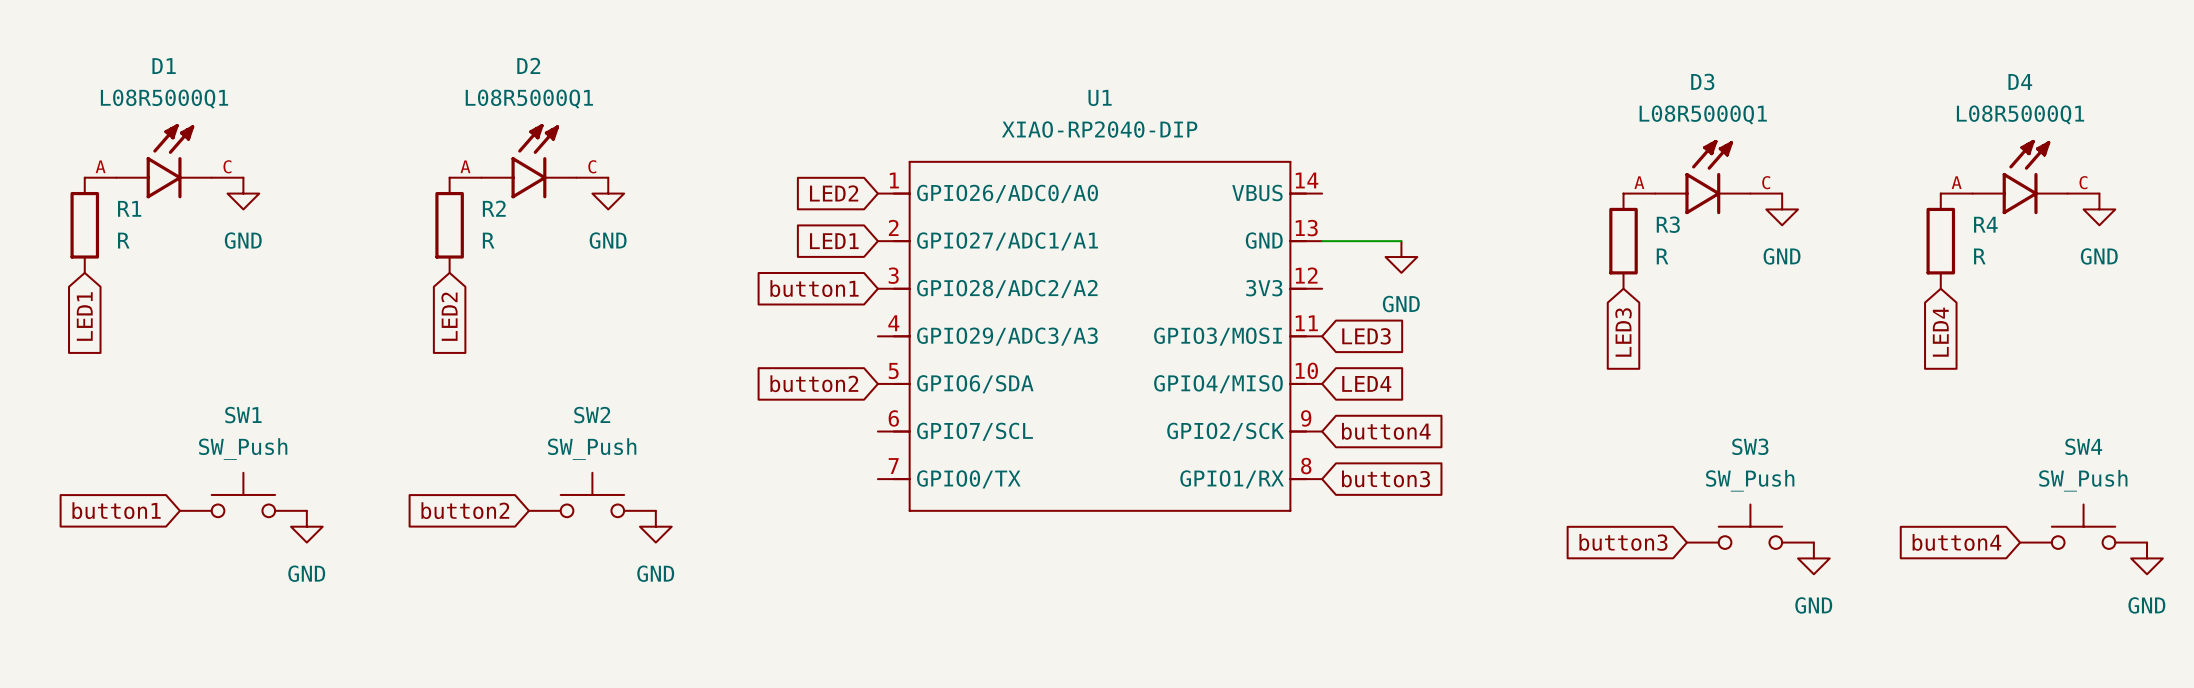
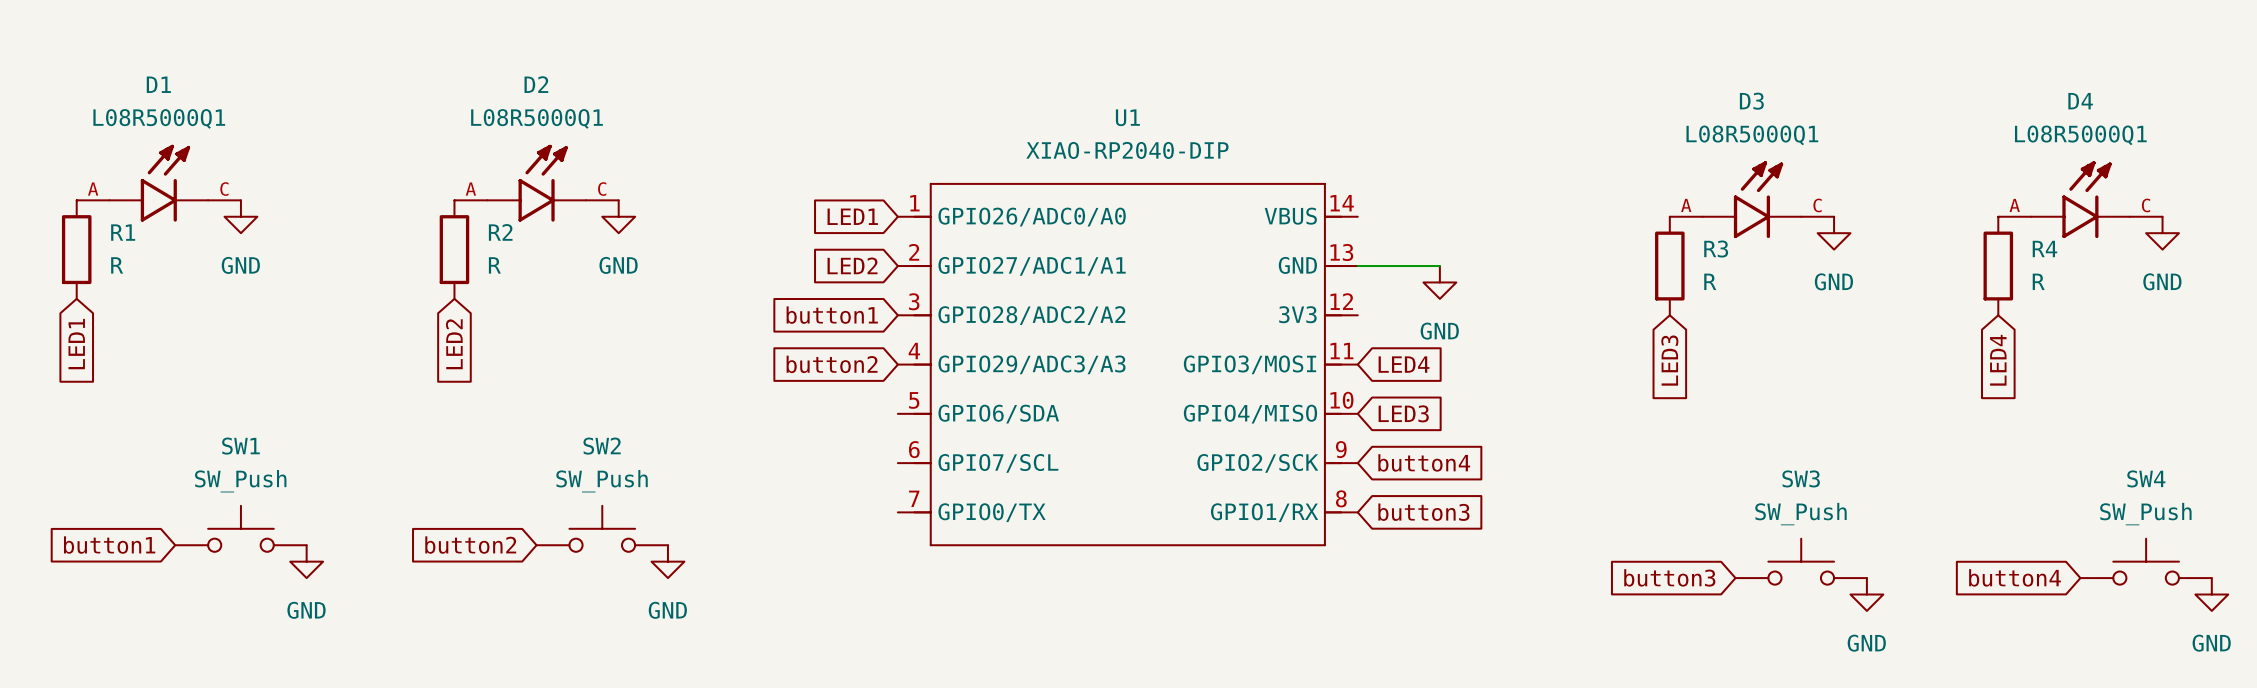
global label: LED2 (834, 193) -> LED1 (852, 216)
global label: LED1 (834, 241) -> LED2 (852, 265)
global label: LED3 (1366, 336) -> LED4 (1404, 364)
global label position: button2 (814, 383) -> button2 (832, 364)
global label: LED4 (1366, 383) -> LED3 (1403, 413)

